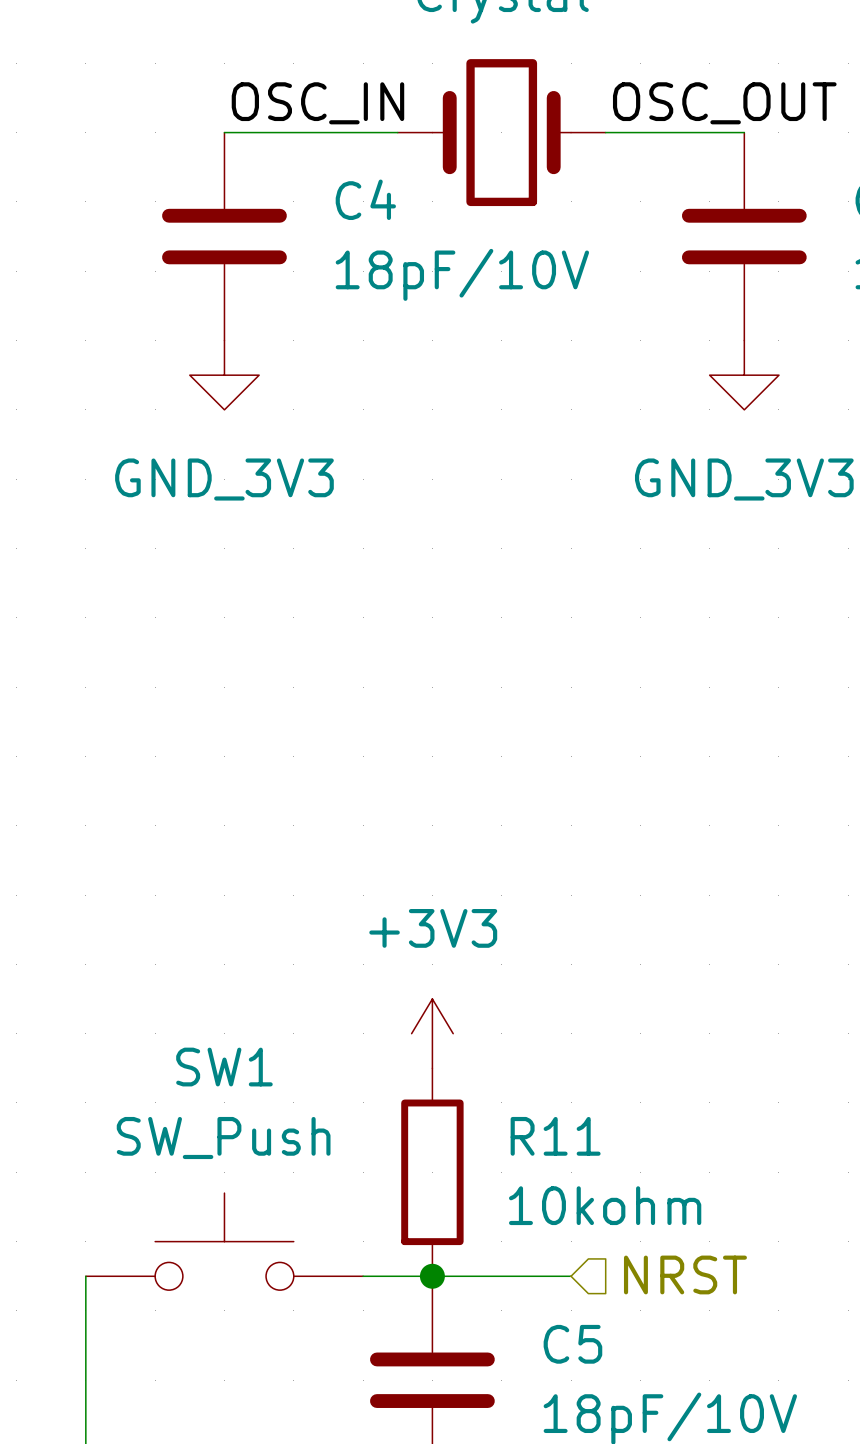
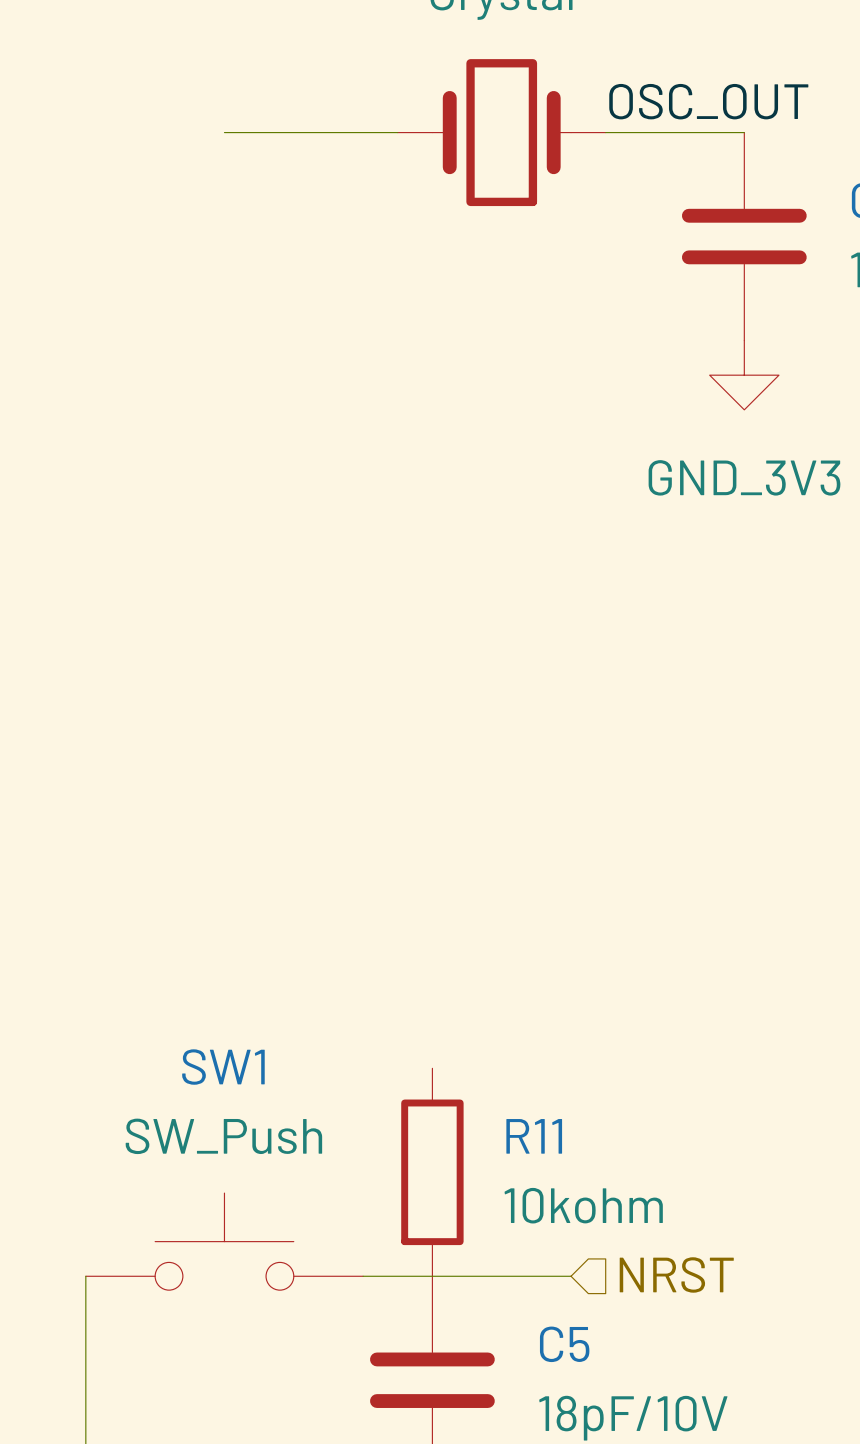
label: OSC_IN (317, 103) -> none
C4: 18pF/10V (224, 236) -> none
power symbol: GND_3V3 (224, 375) -> none
power symbol: +3V3 (432, 1033) -> none
junction: (432, 1276) -> none

